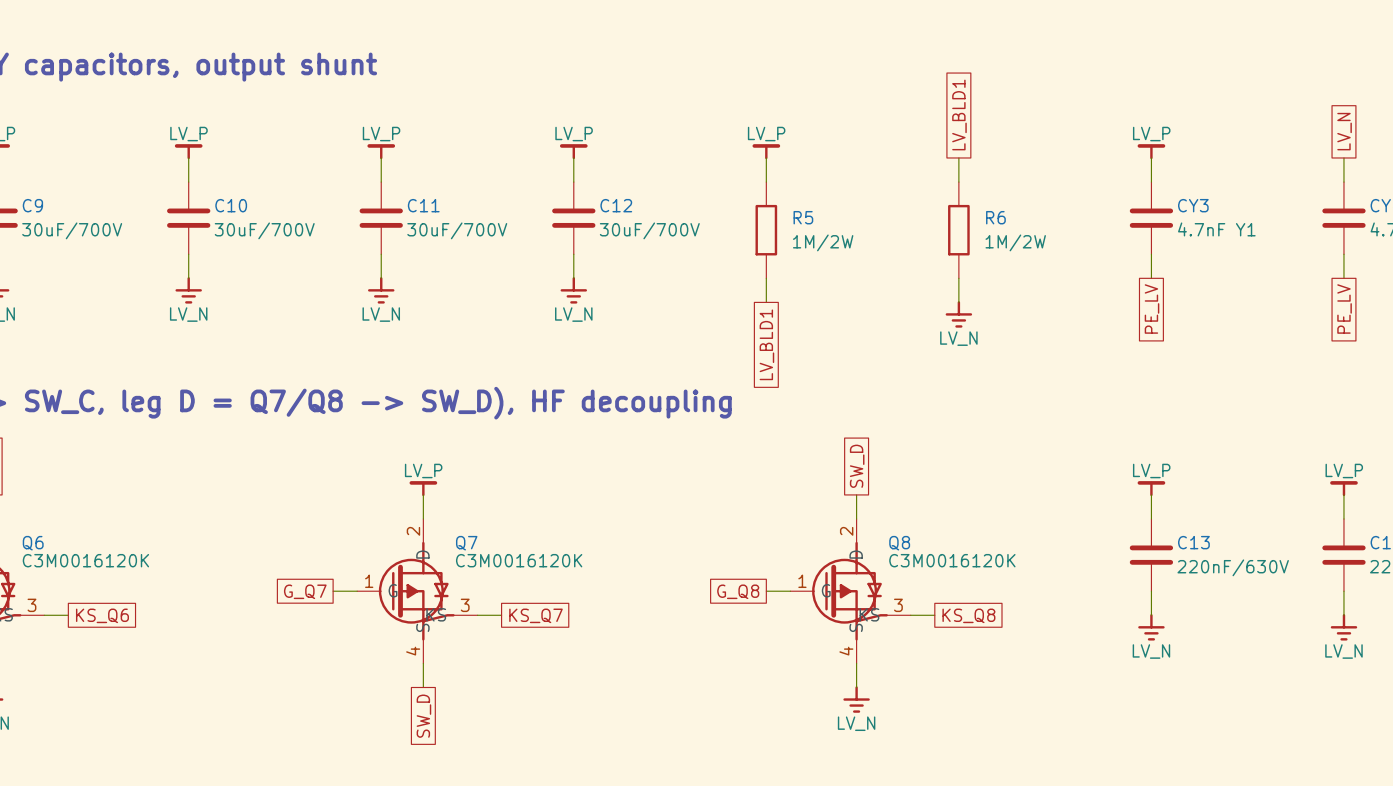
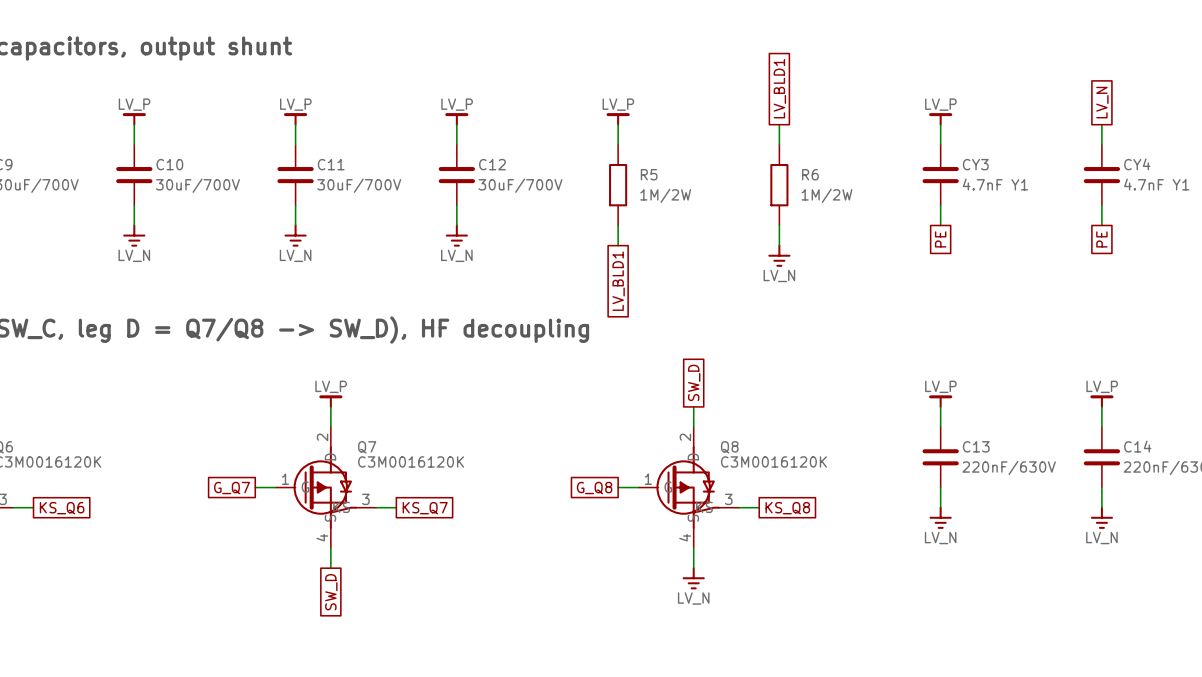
global label: PE_LV (1152, 309) -> PE (940, 239)
global label: PE_LV (1344, 309) -> PE (1101, 239)

